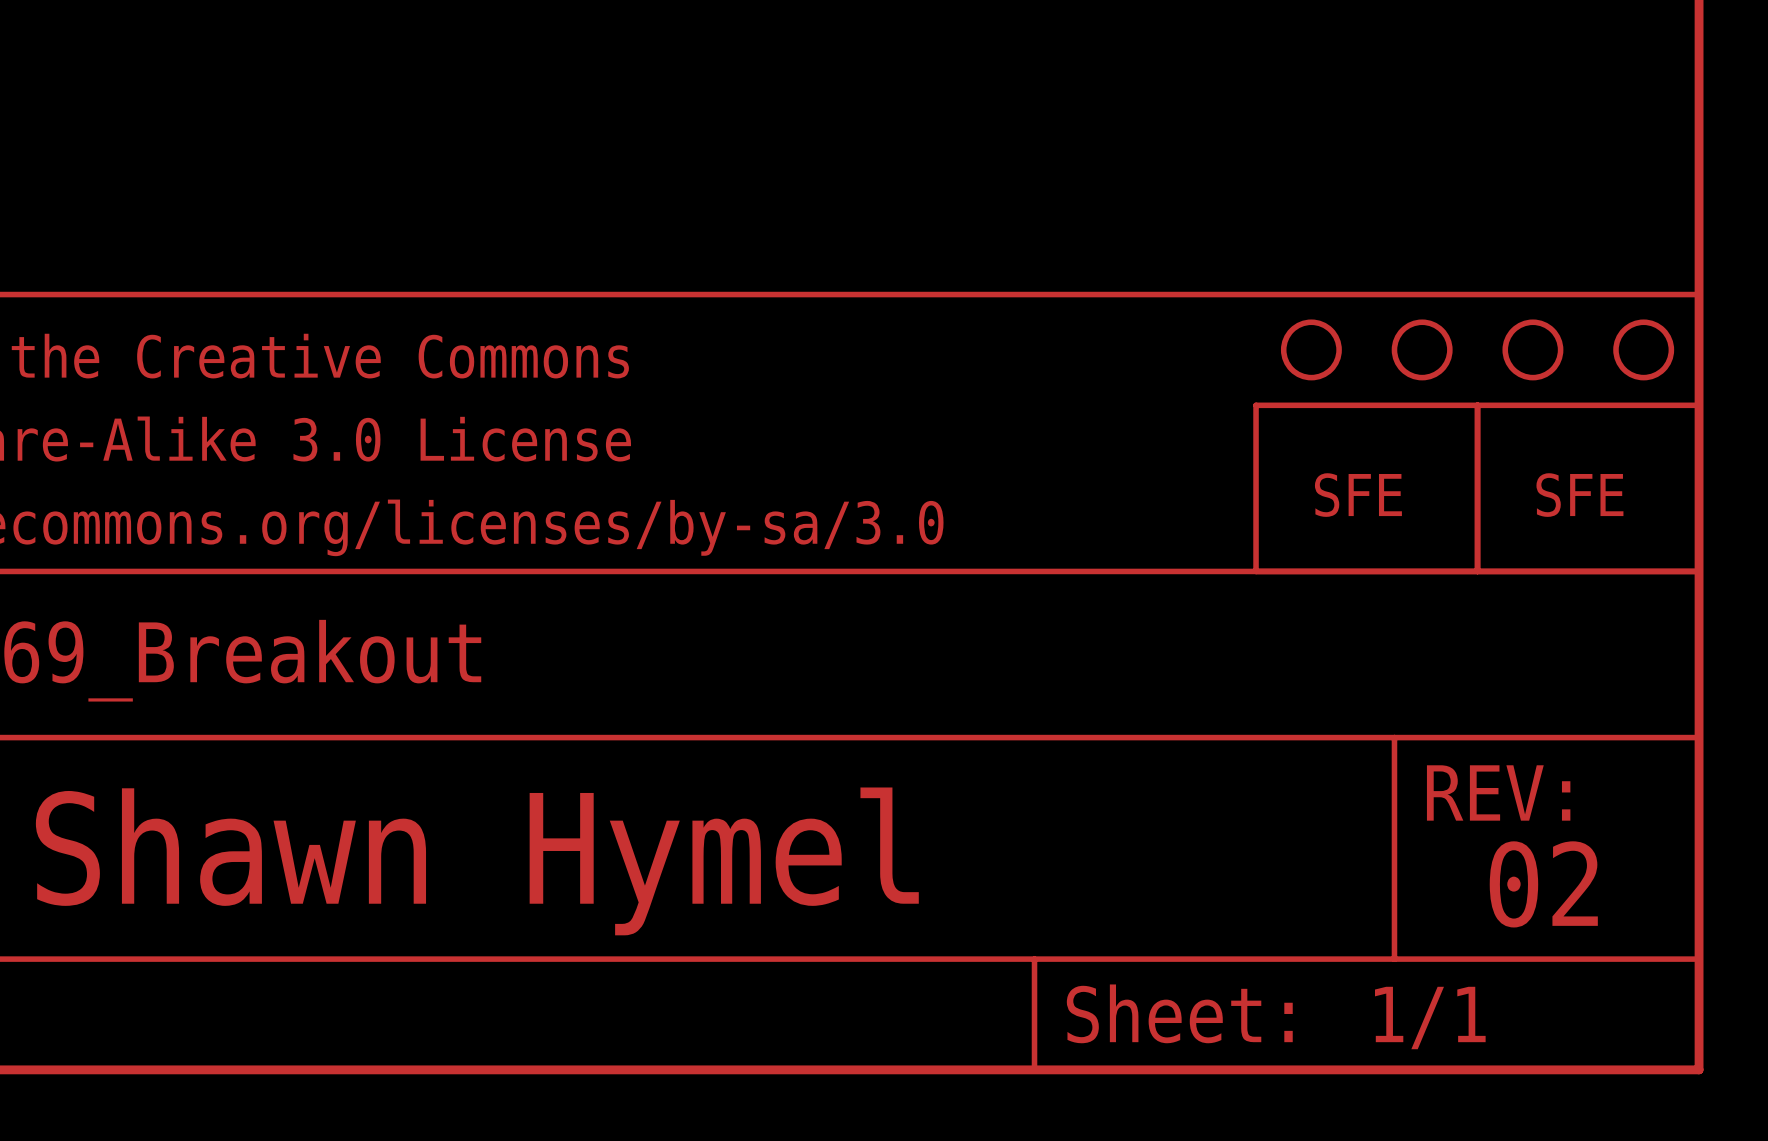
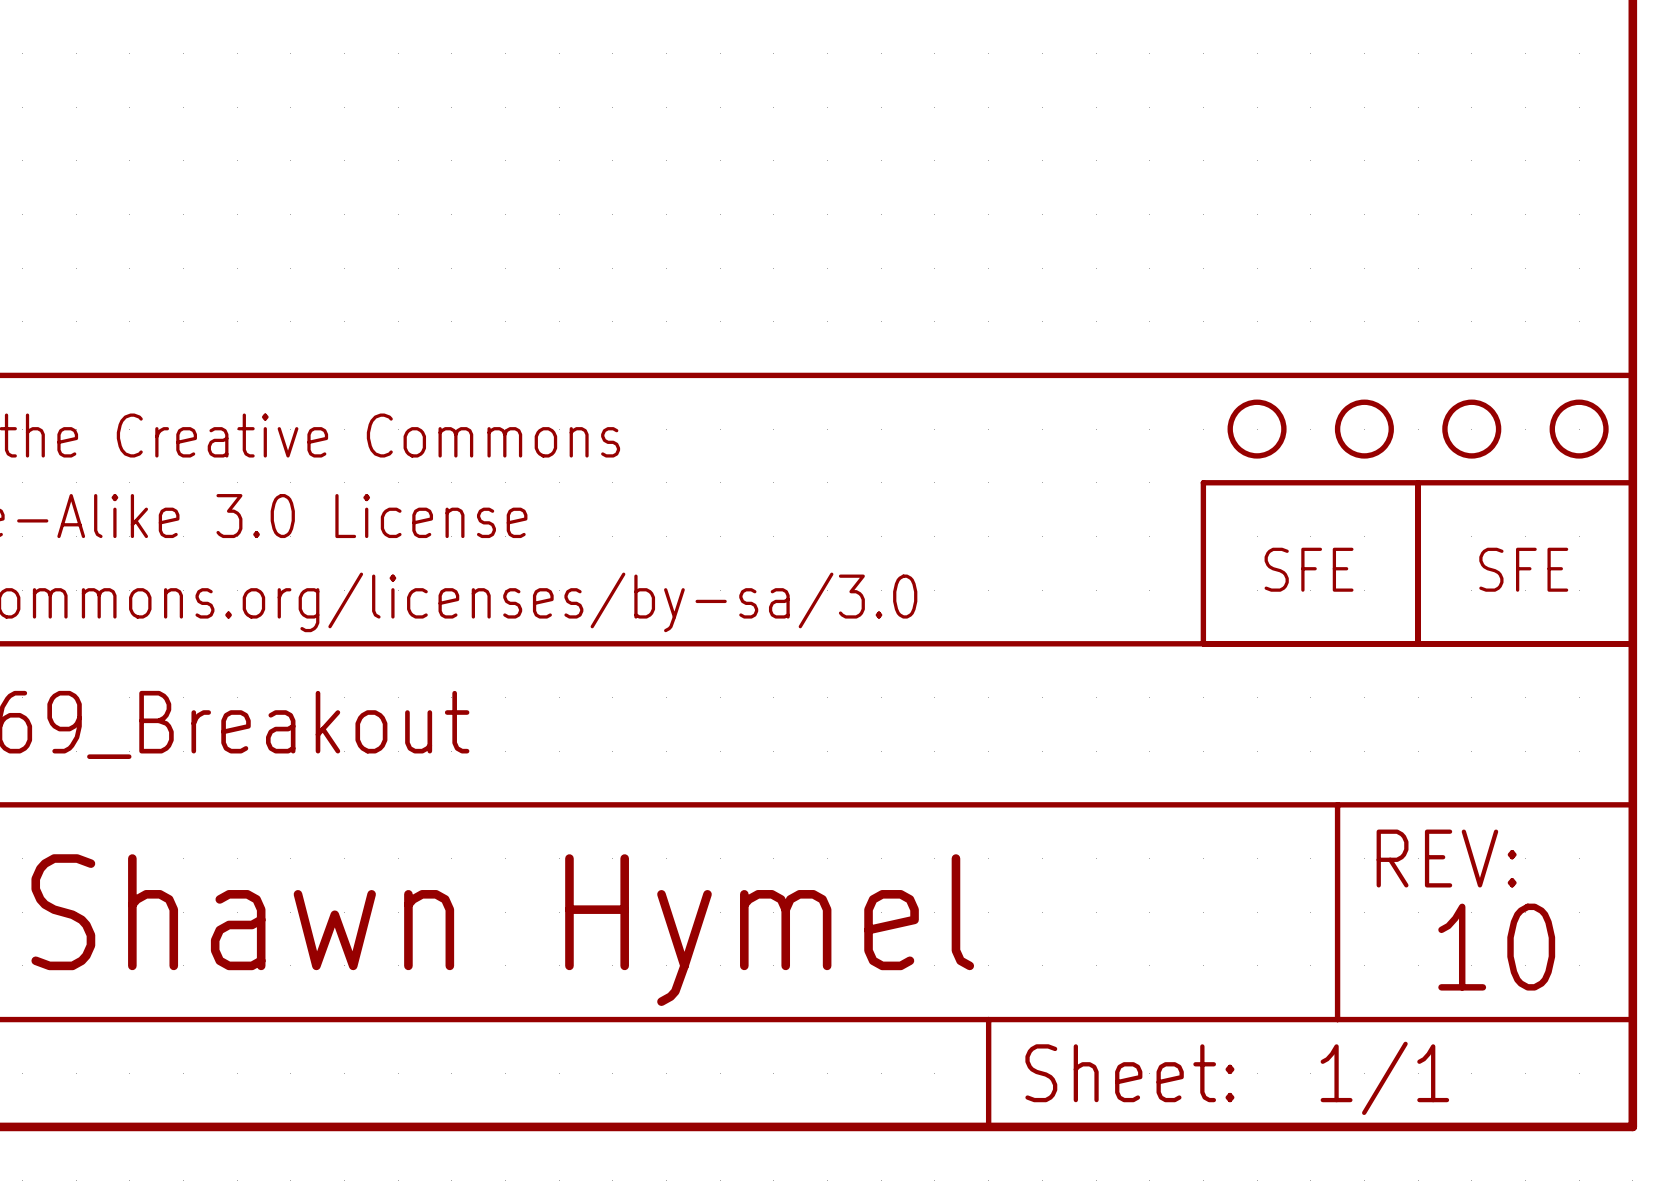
text: 02 (1543, 884) -> 10 (1496, 947)

